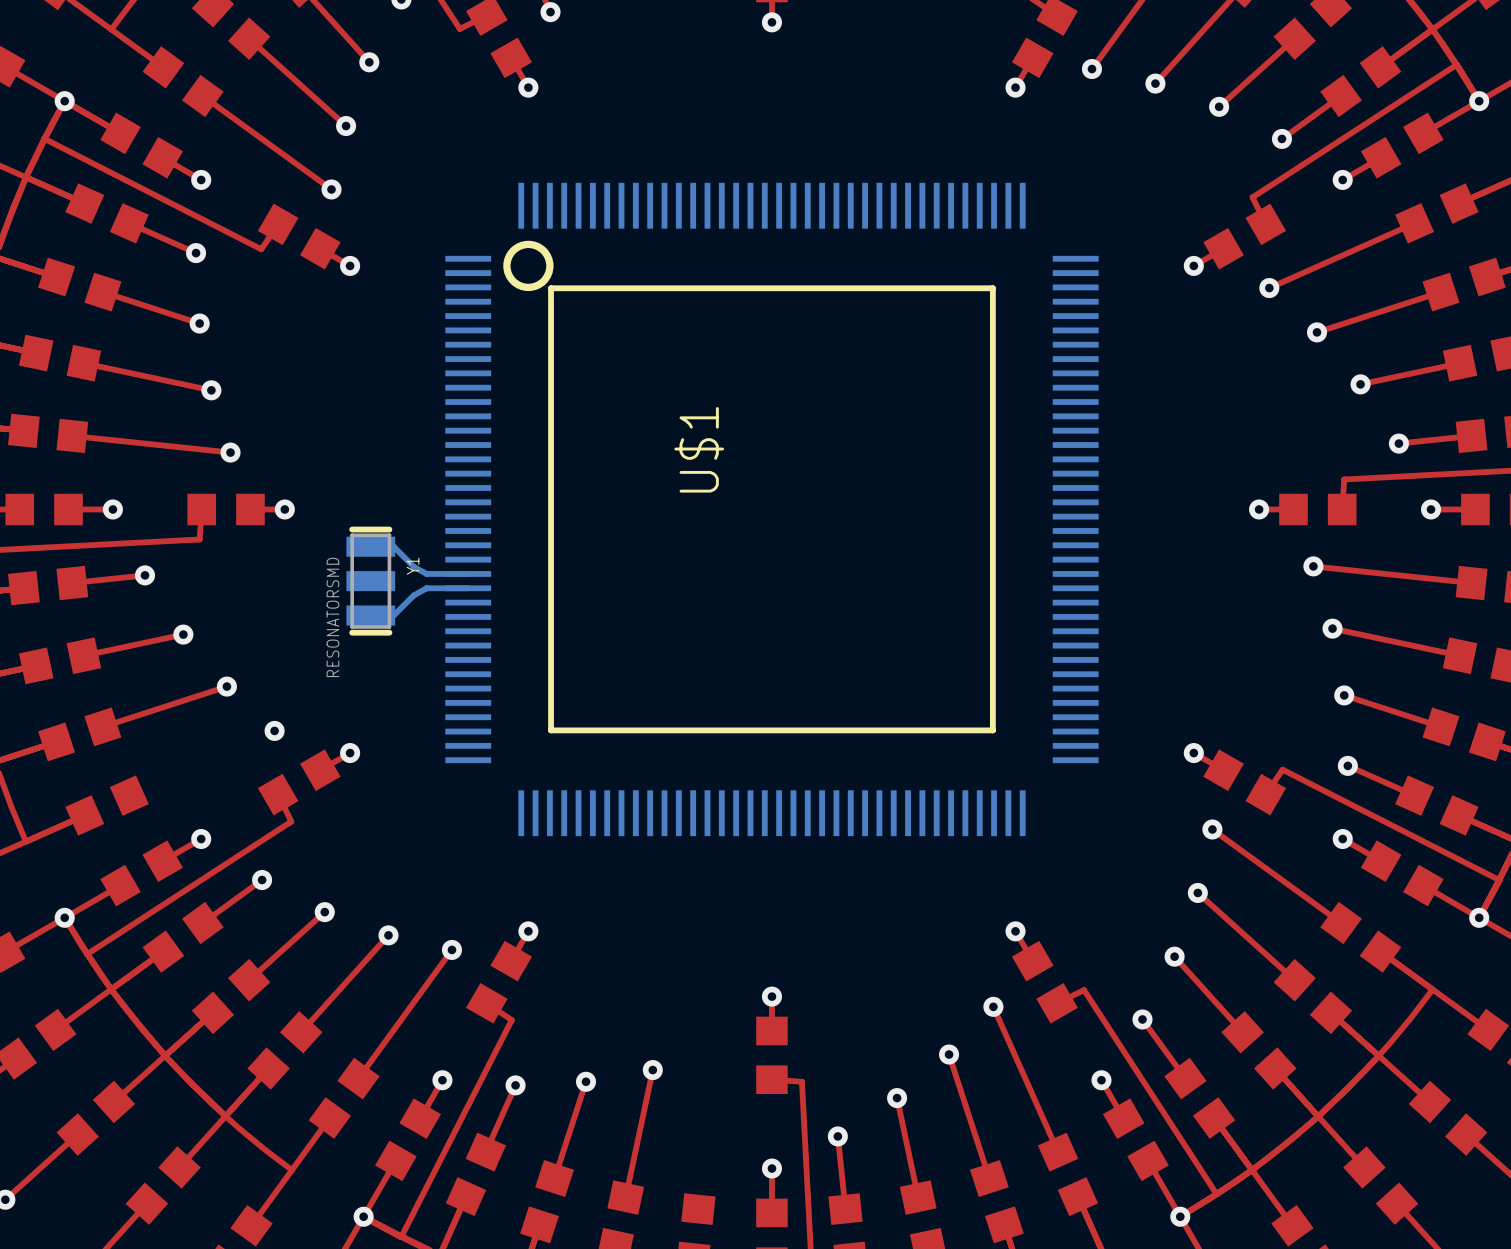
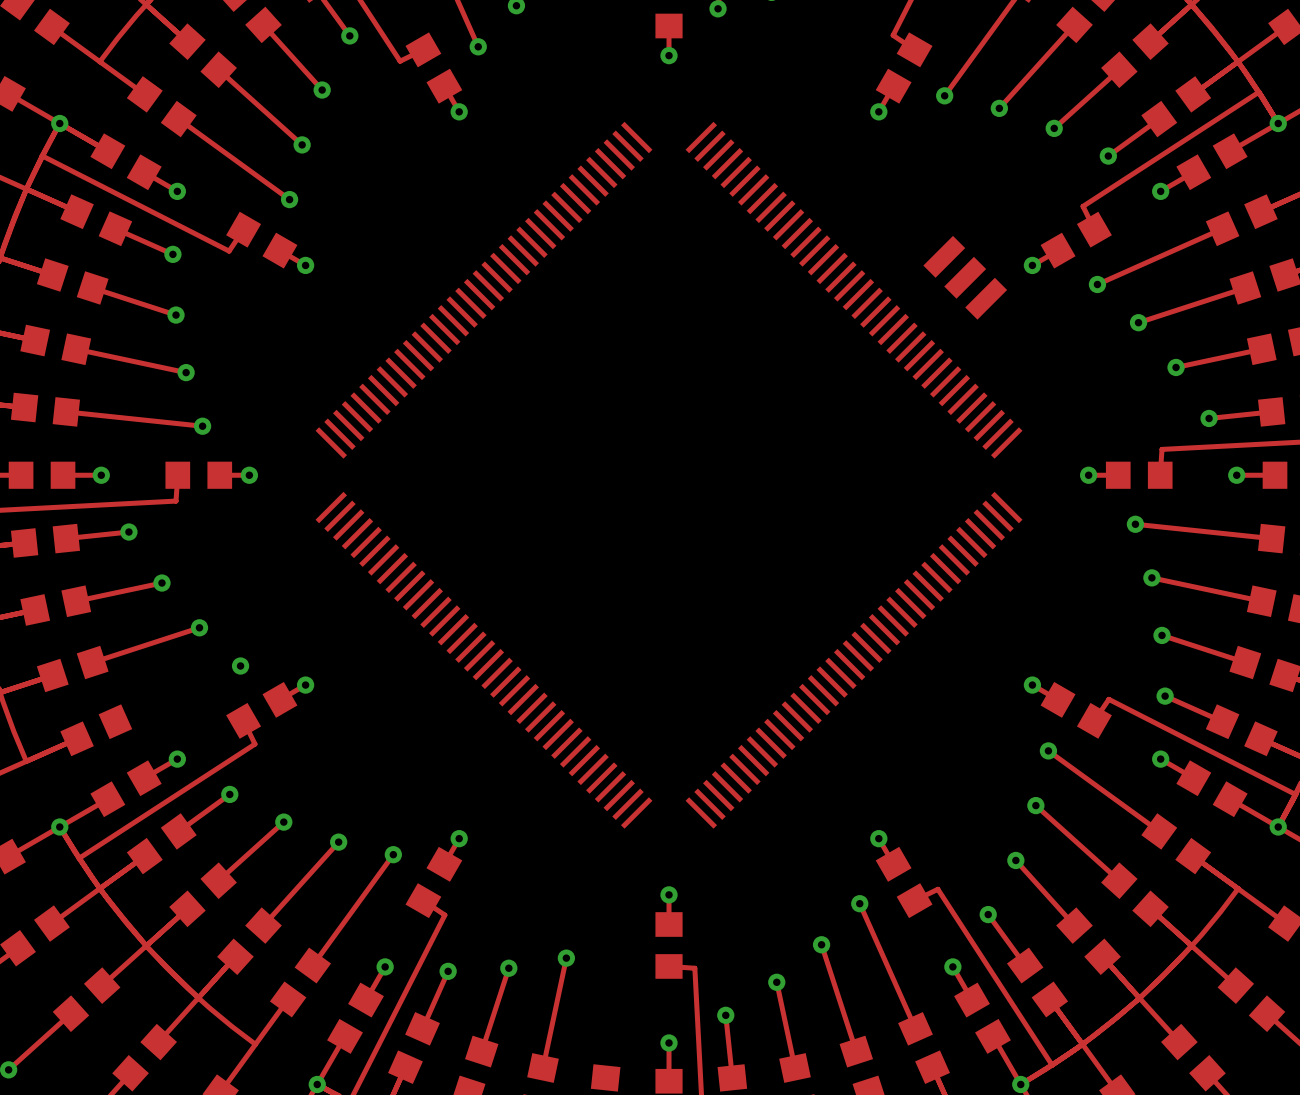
part: none -> (965, 277)
U$1 side: bottom (771, 509) -> top (669, 475)
bottom track: (370, 546) (393, 546) (413, 566) (426, 573) (468, 573) -> none
Y1: RESONATORSMD (370, 581) -> none
bottom track: (468, 588) (426, 588) (413, 595) (393, 615) (370, 615) -> none

